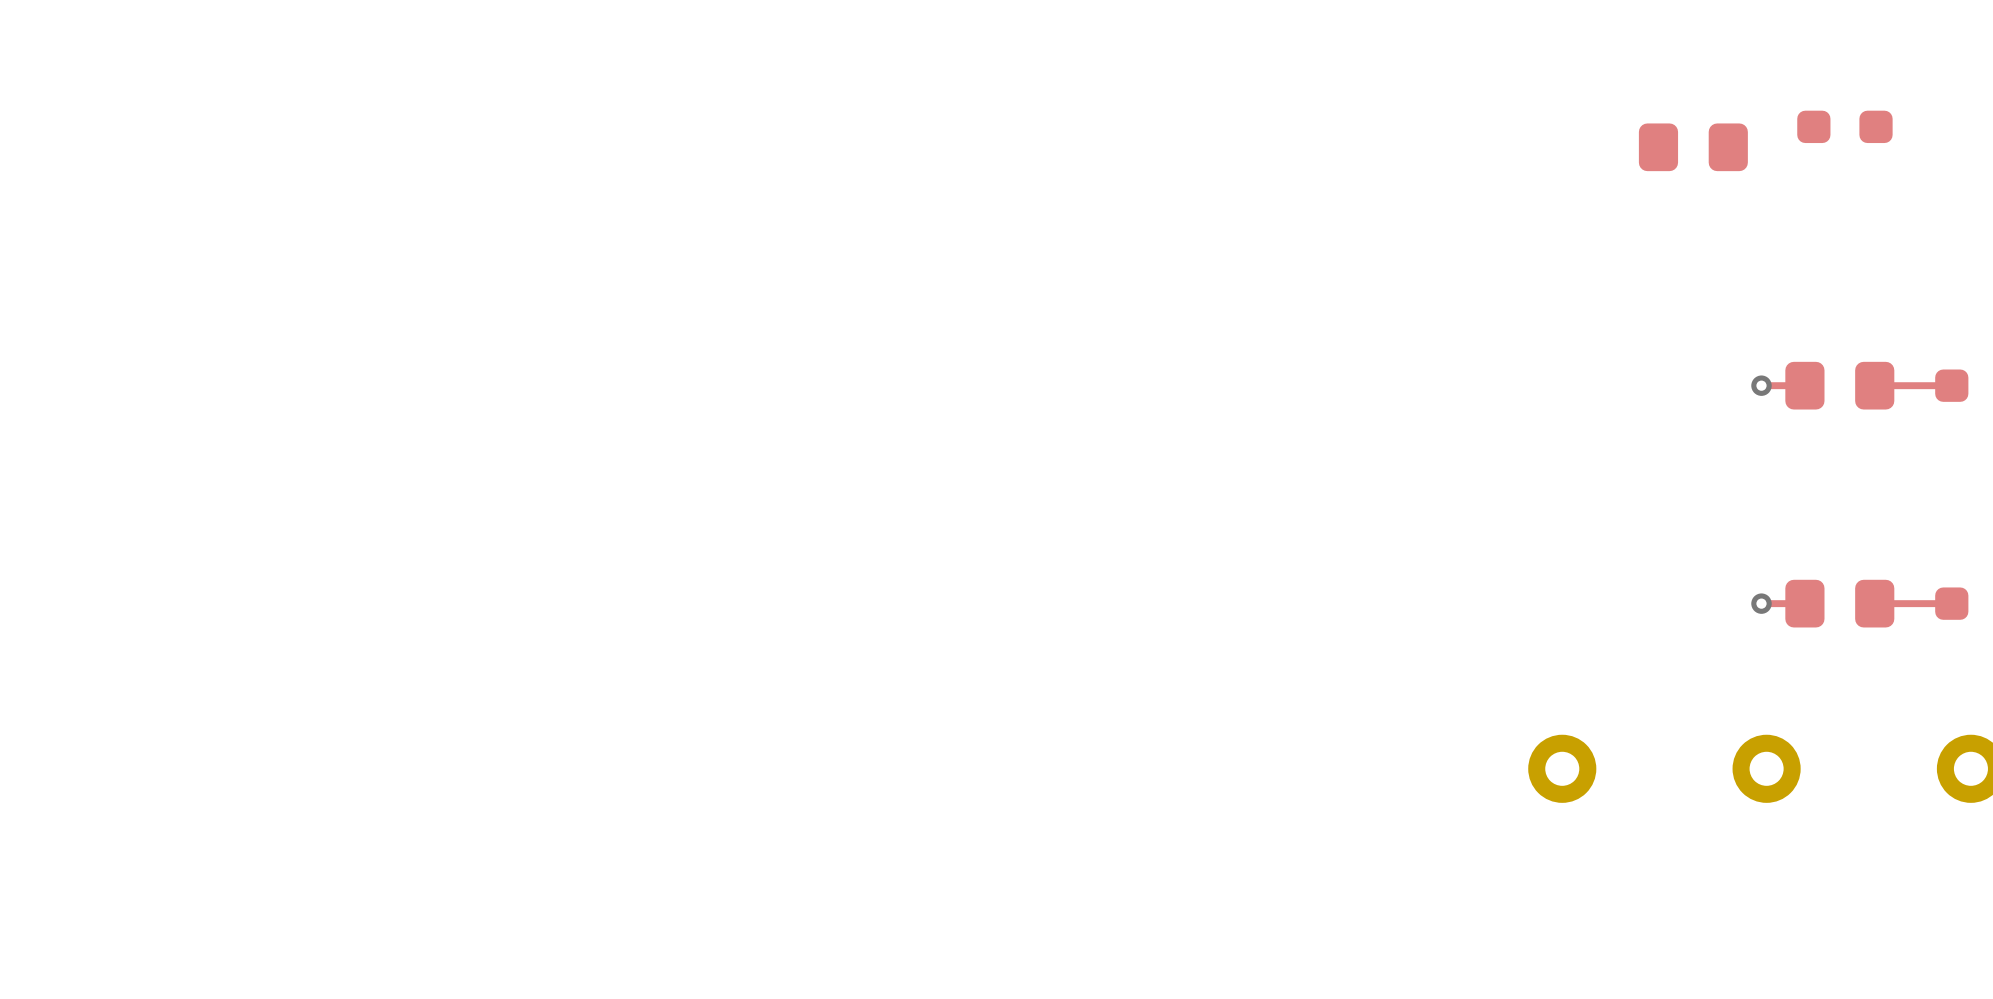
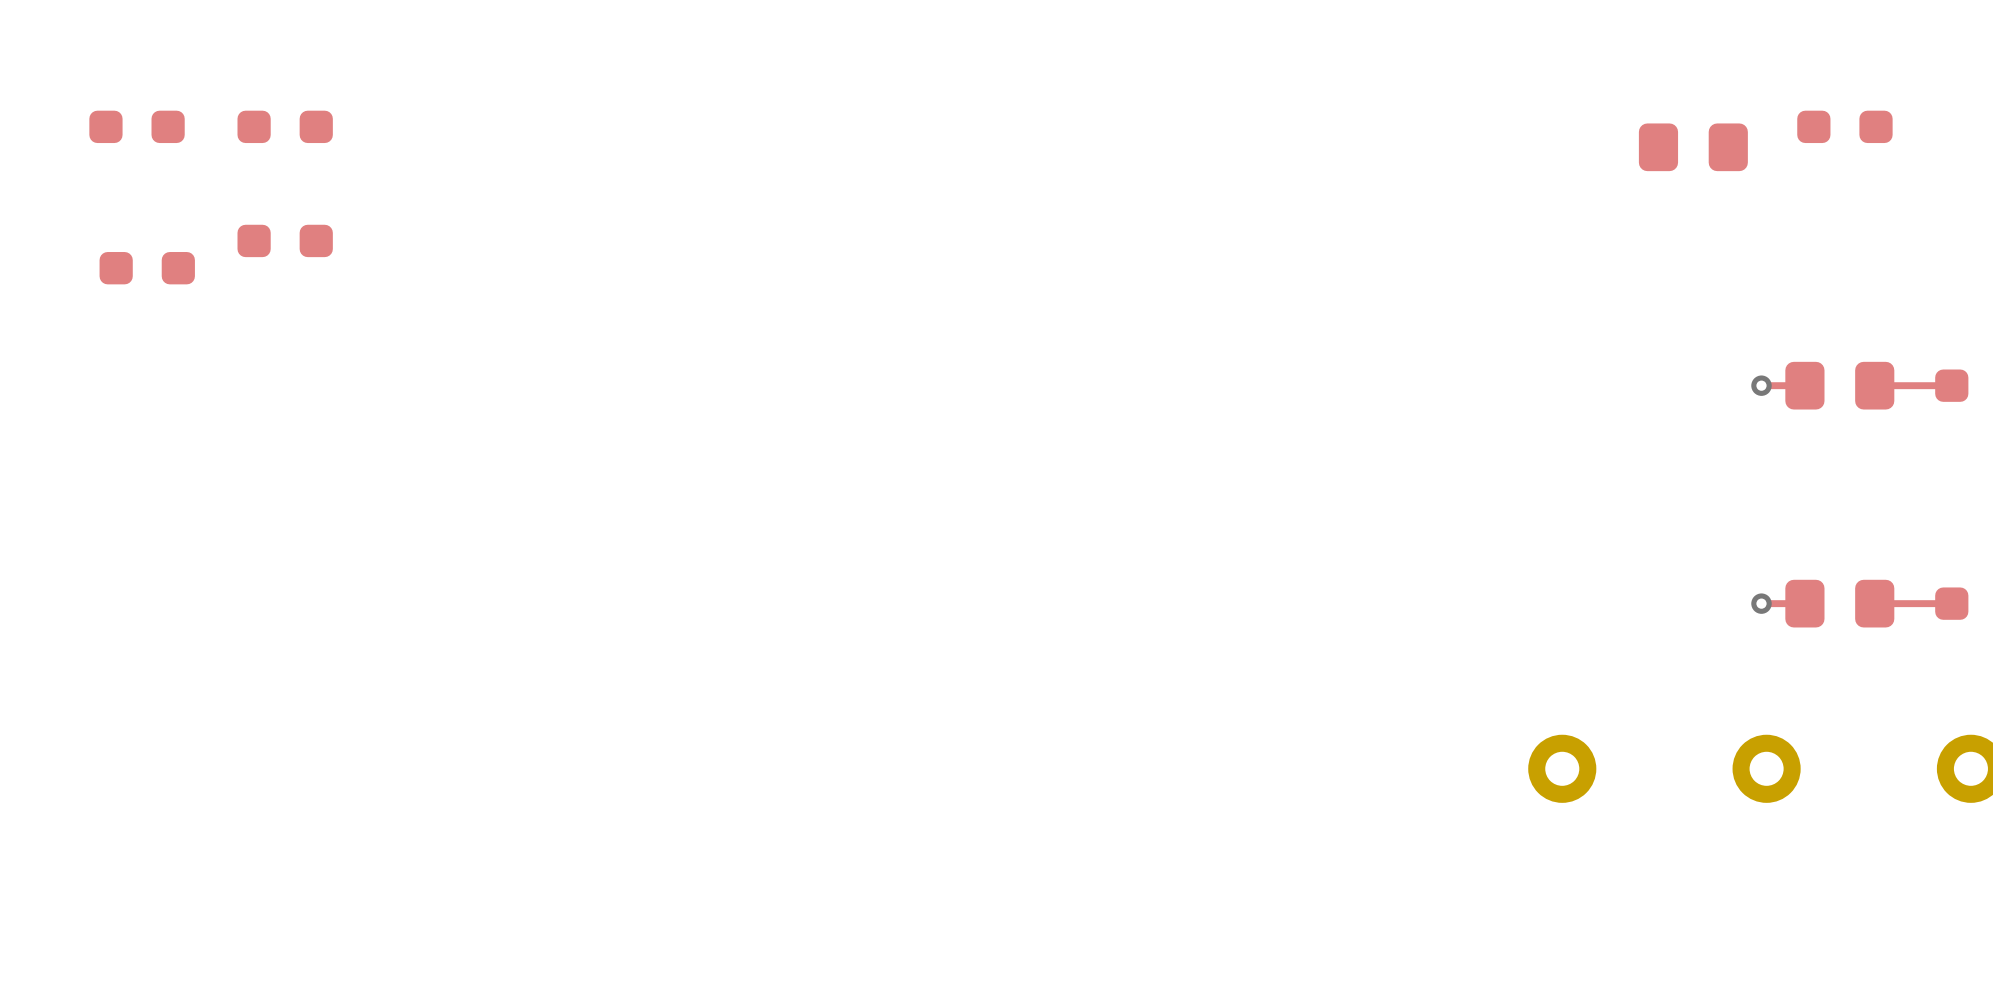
part: none -> (137, 126)
part: none -> (285, 126)
part: none -> (285, 240)
part: none -> (147, 268)

